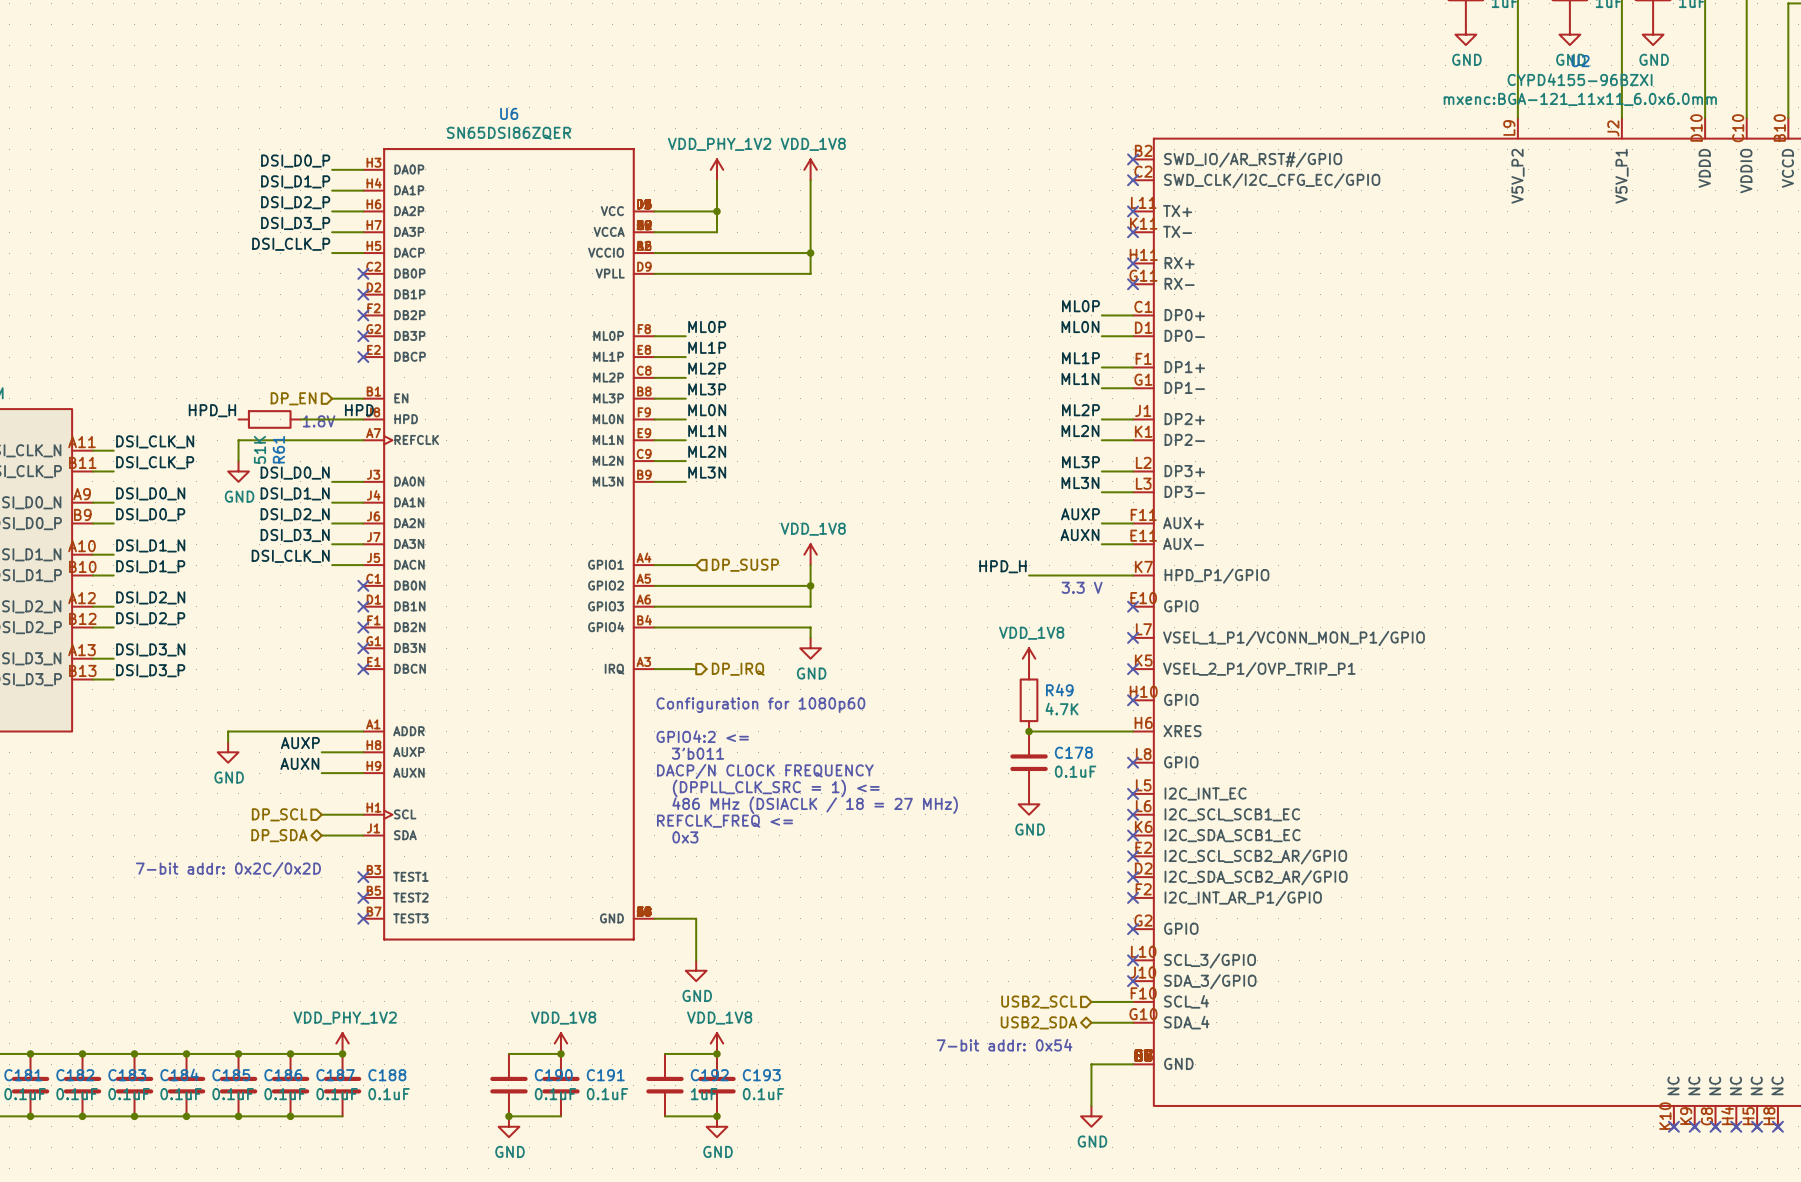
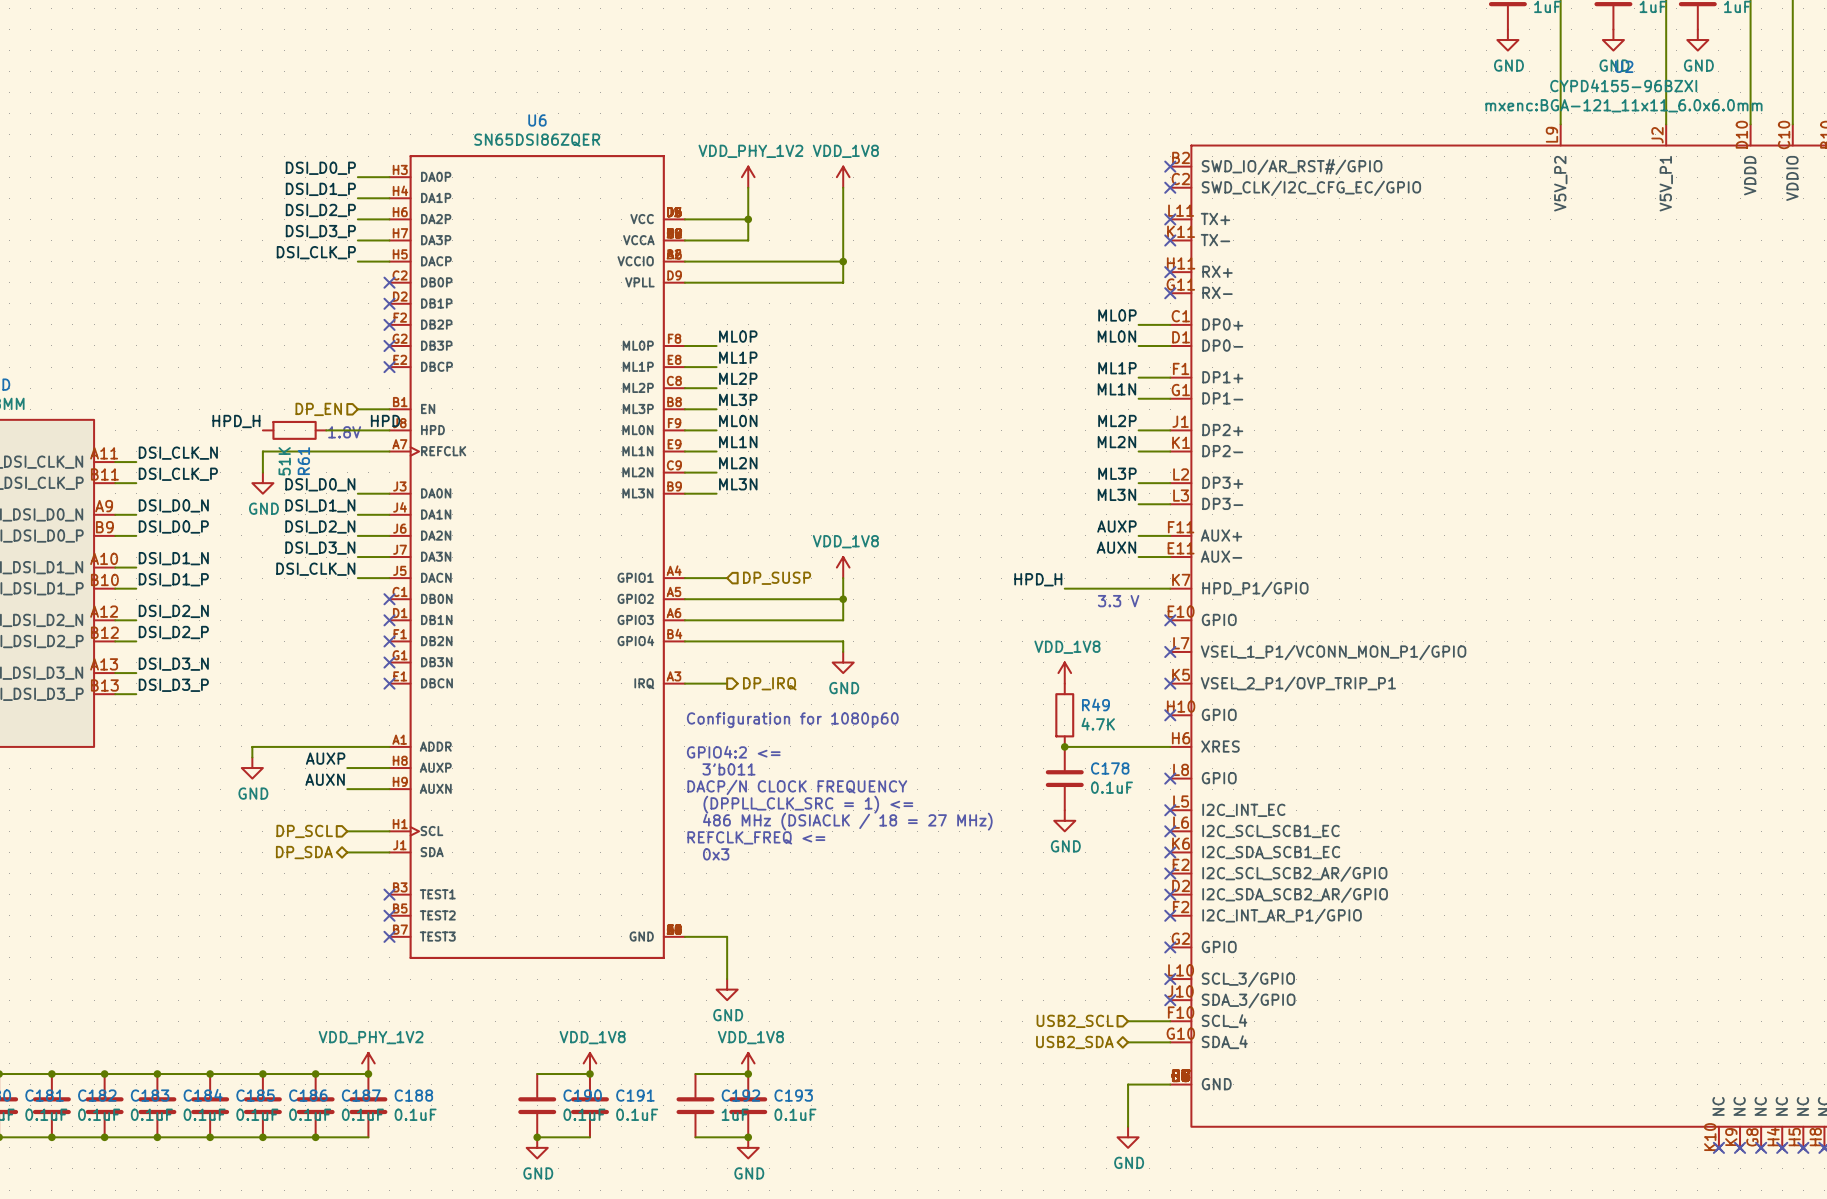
text: 7-bit addr: 0x2C/0x2D (228, 869) -> none
text: 7-bit addr: 0x54 (1004, 1045) -> none

